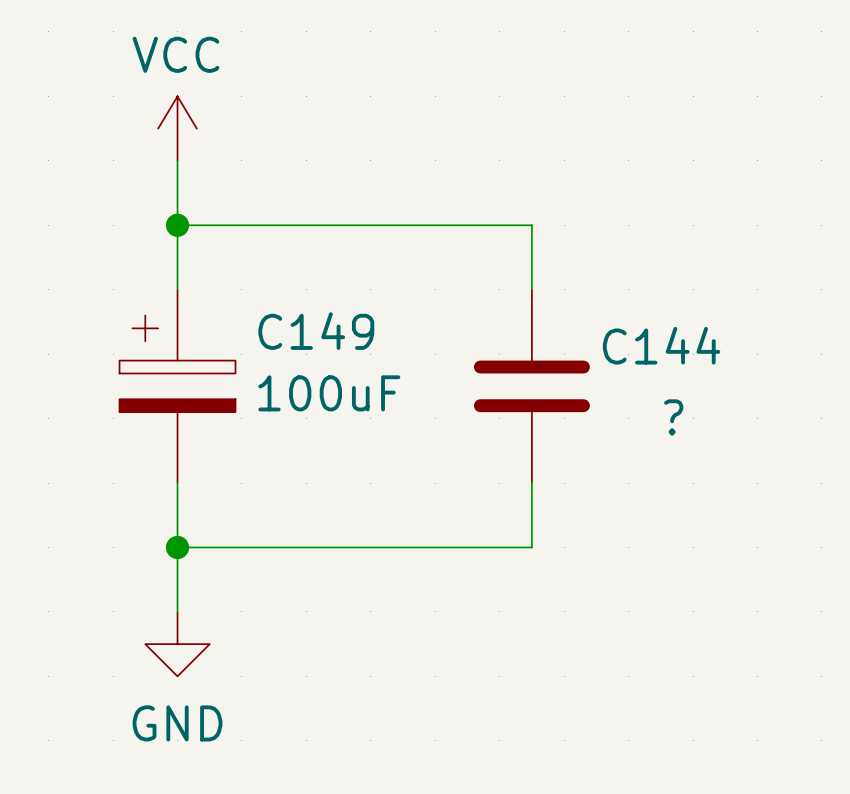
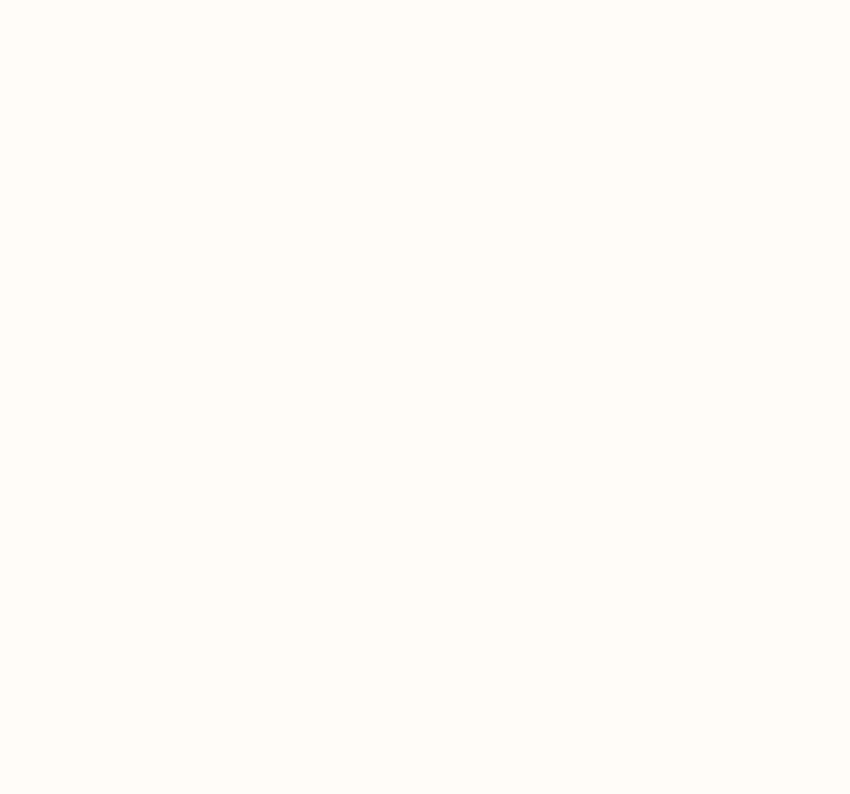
power symbol: VCC (177, 128) -> none
wire: (177, 160) (177, 289) -> none
wire: (177, 225) (531, 225) (531, 289) -> none
junction: (177, 225) -> none
C149: 100uF (177, 386) -> none
C144: ? (531, 386) -> none
wire: (177, 483) (177, 611) -> none
wire: (531, 483) (531, 547) (177, 547) -> none
junction: (177, 547) -> none
power symbol: GND (177, 644) -> none

